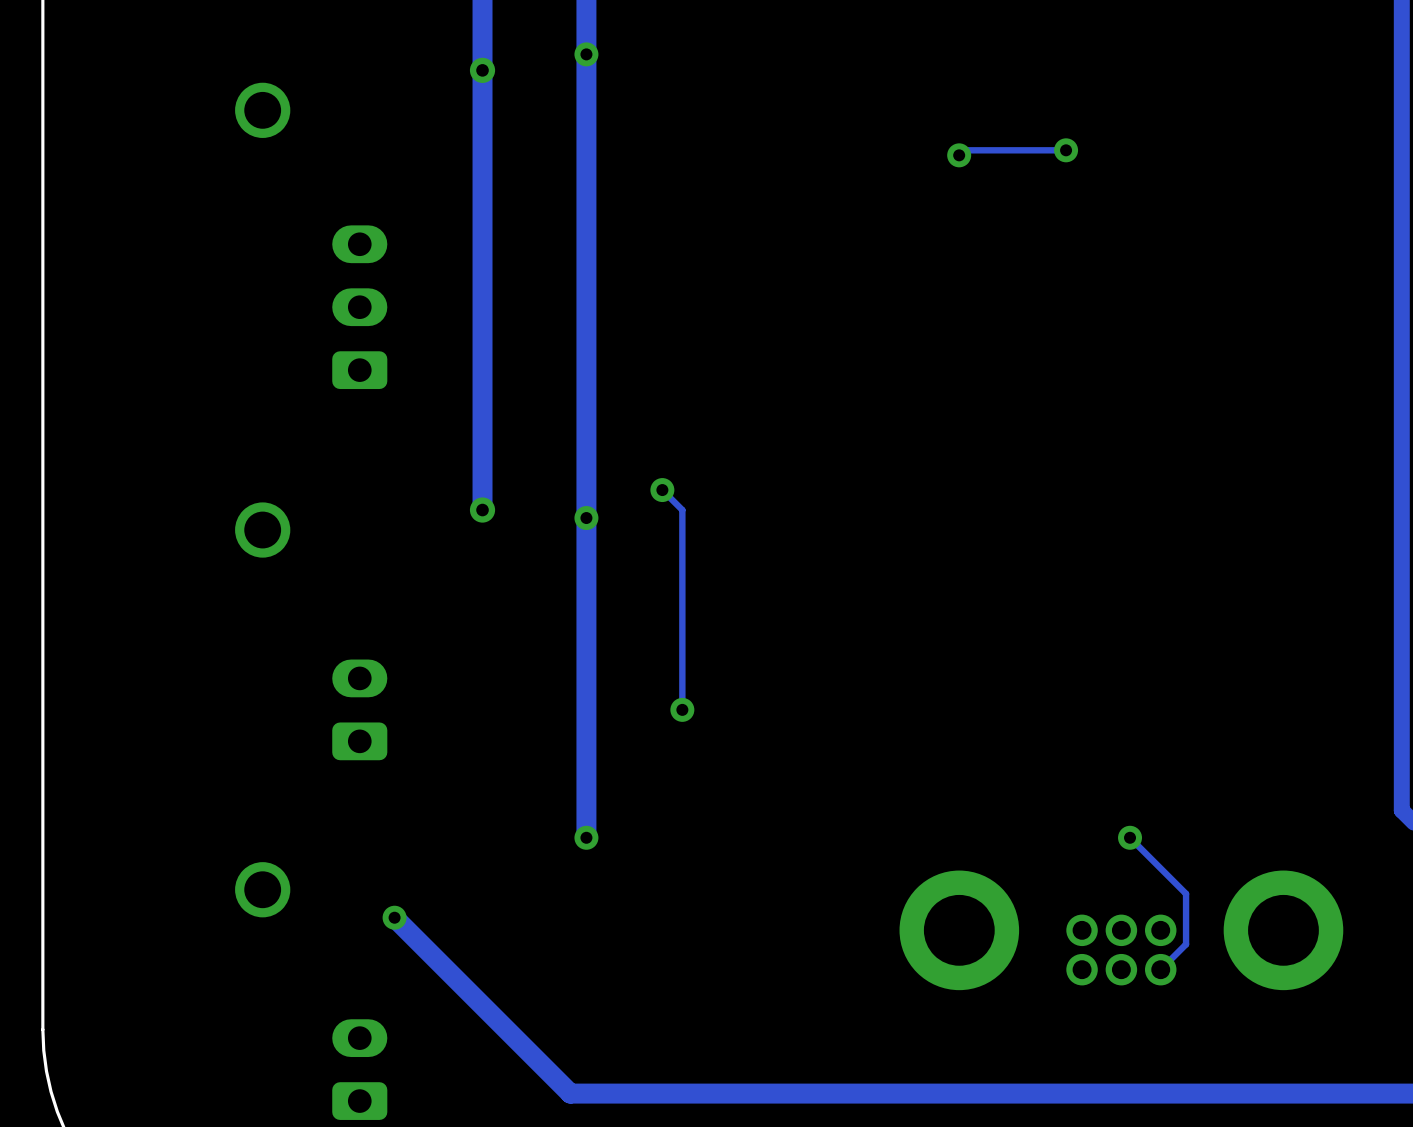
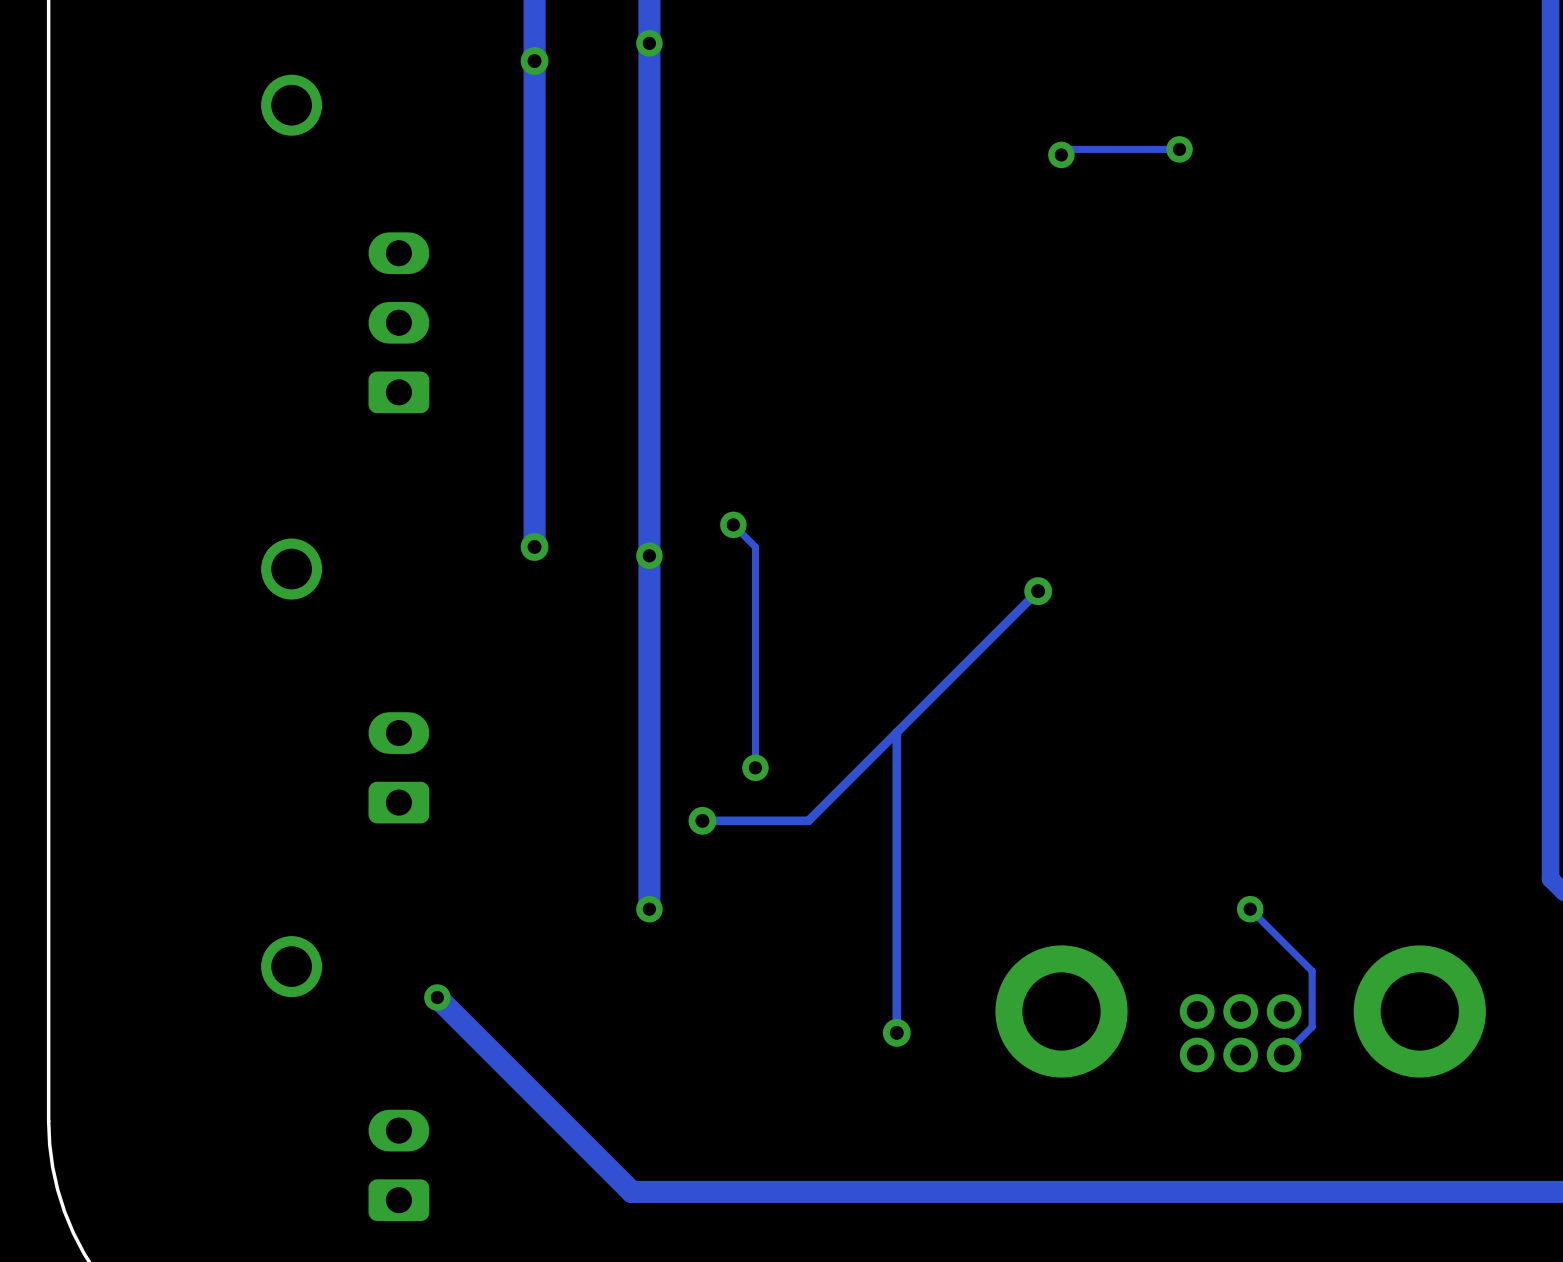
track: none -> (1038, 591) (808, 820) (702, 820)
via: none -> (1038, 591)
track: none -> (896, 732) (896, 1032)
via: none -> (702, 820)
via: none -> (896, 1032)

